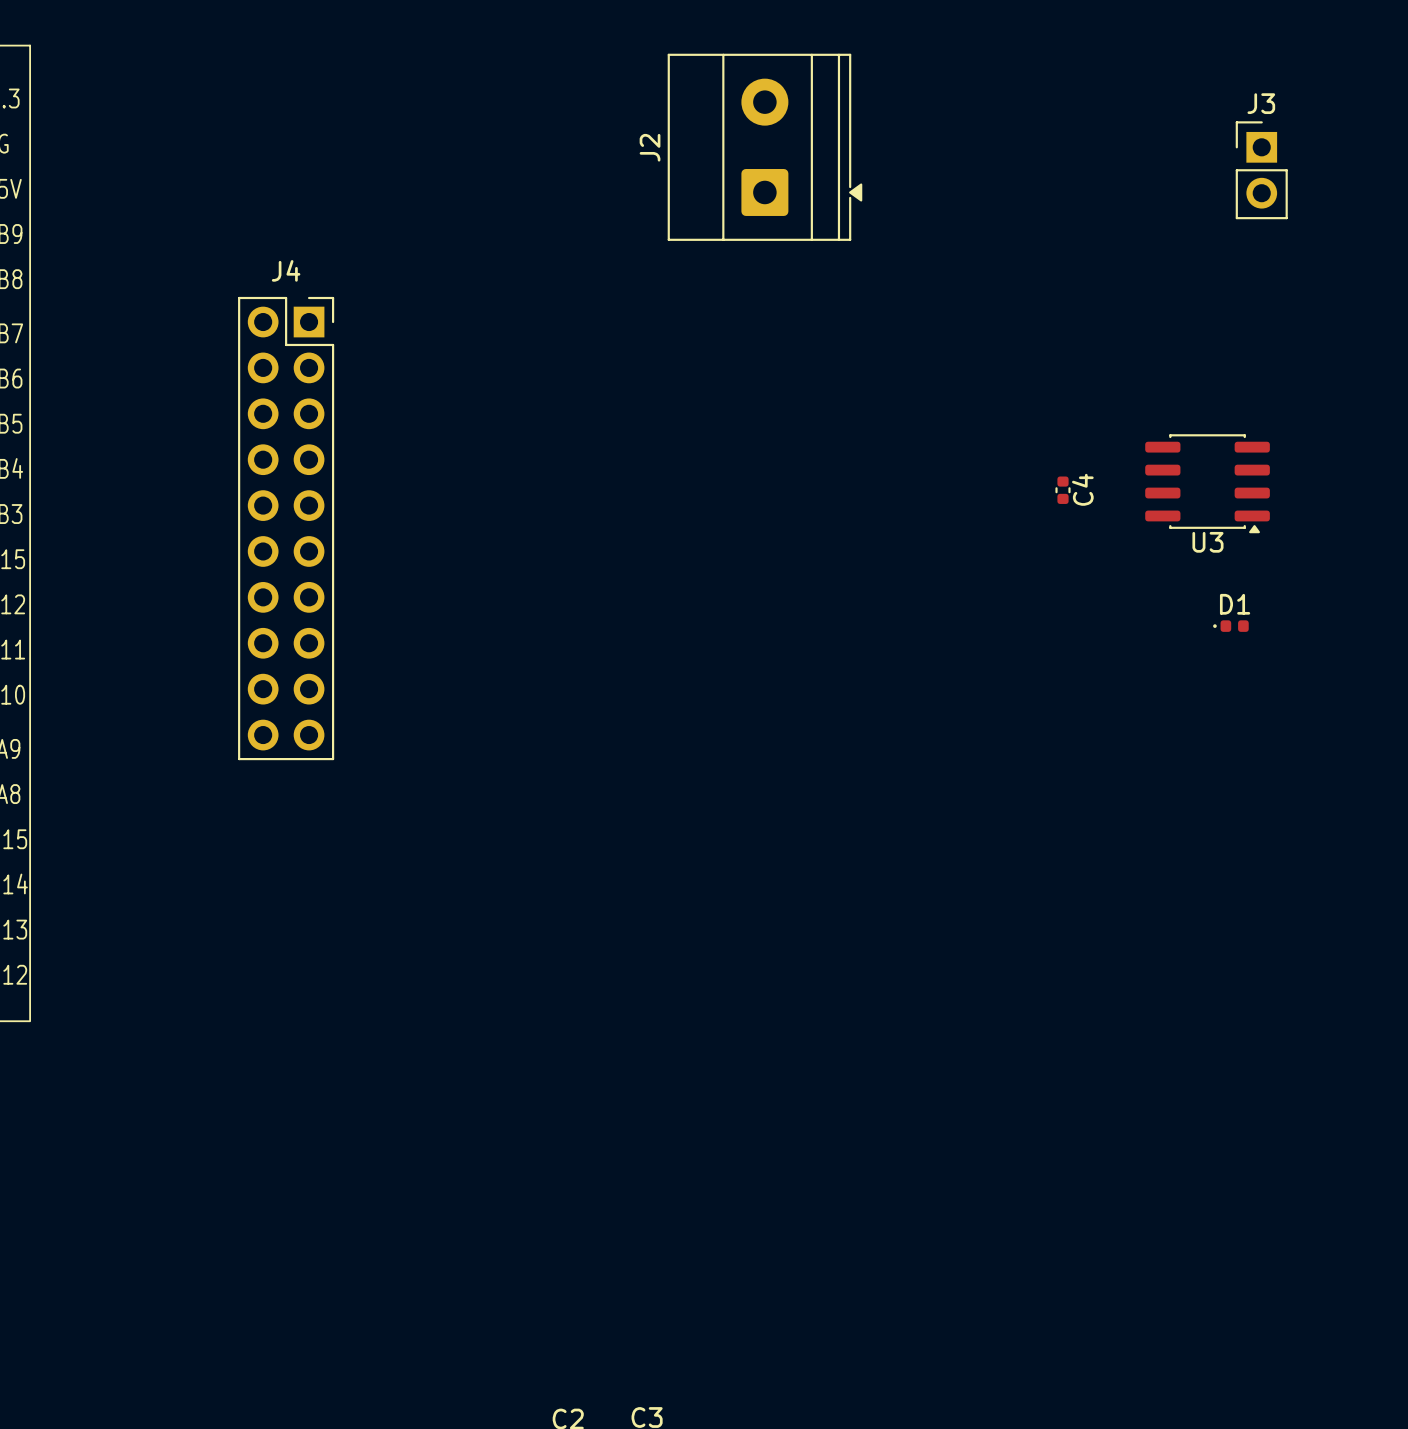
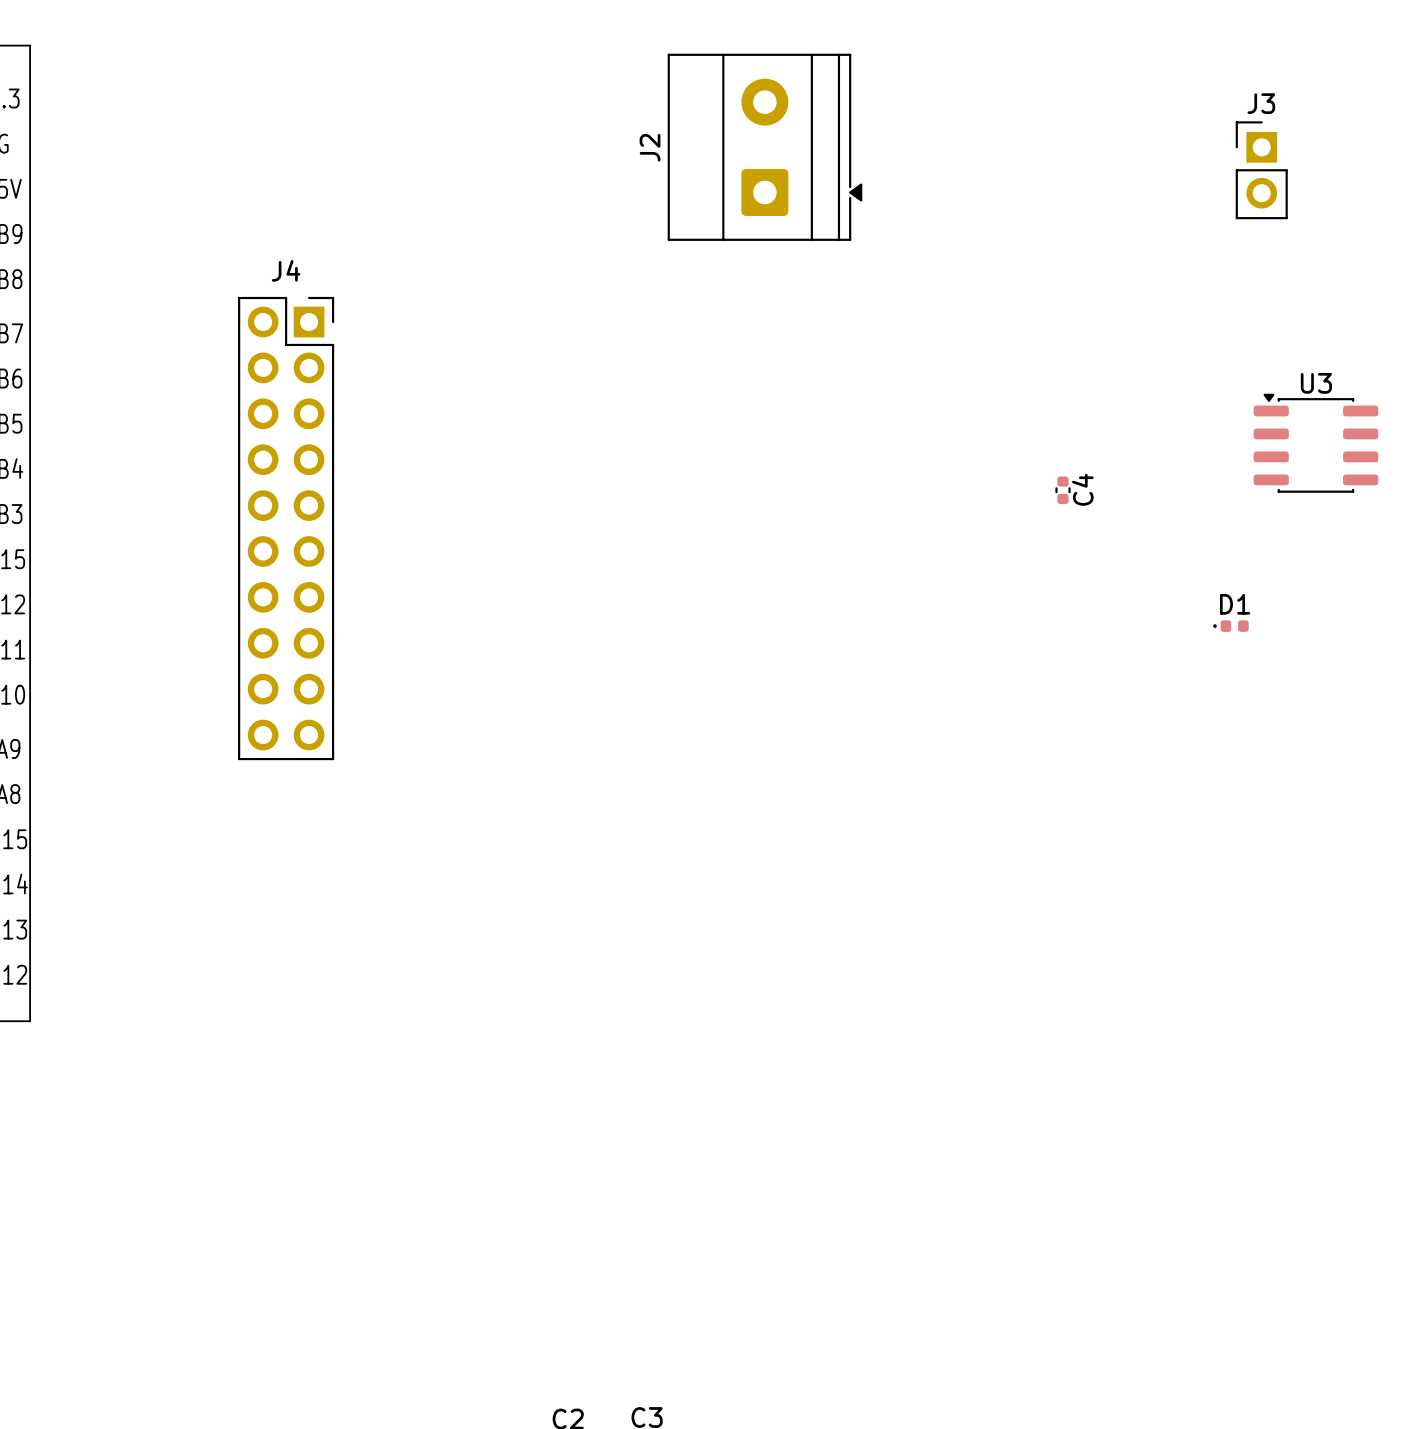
U3 rotation: 0° (1207, 483) -> 180° (1315, 443)
U3 position: (1207, 483) -> (1315, 443)

